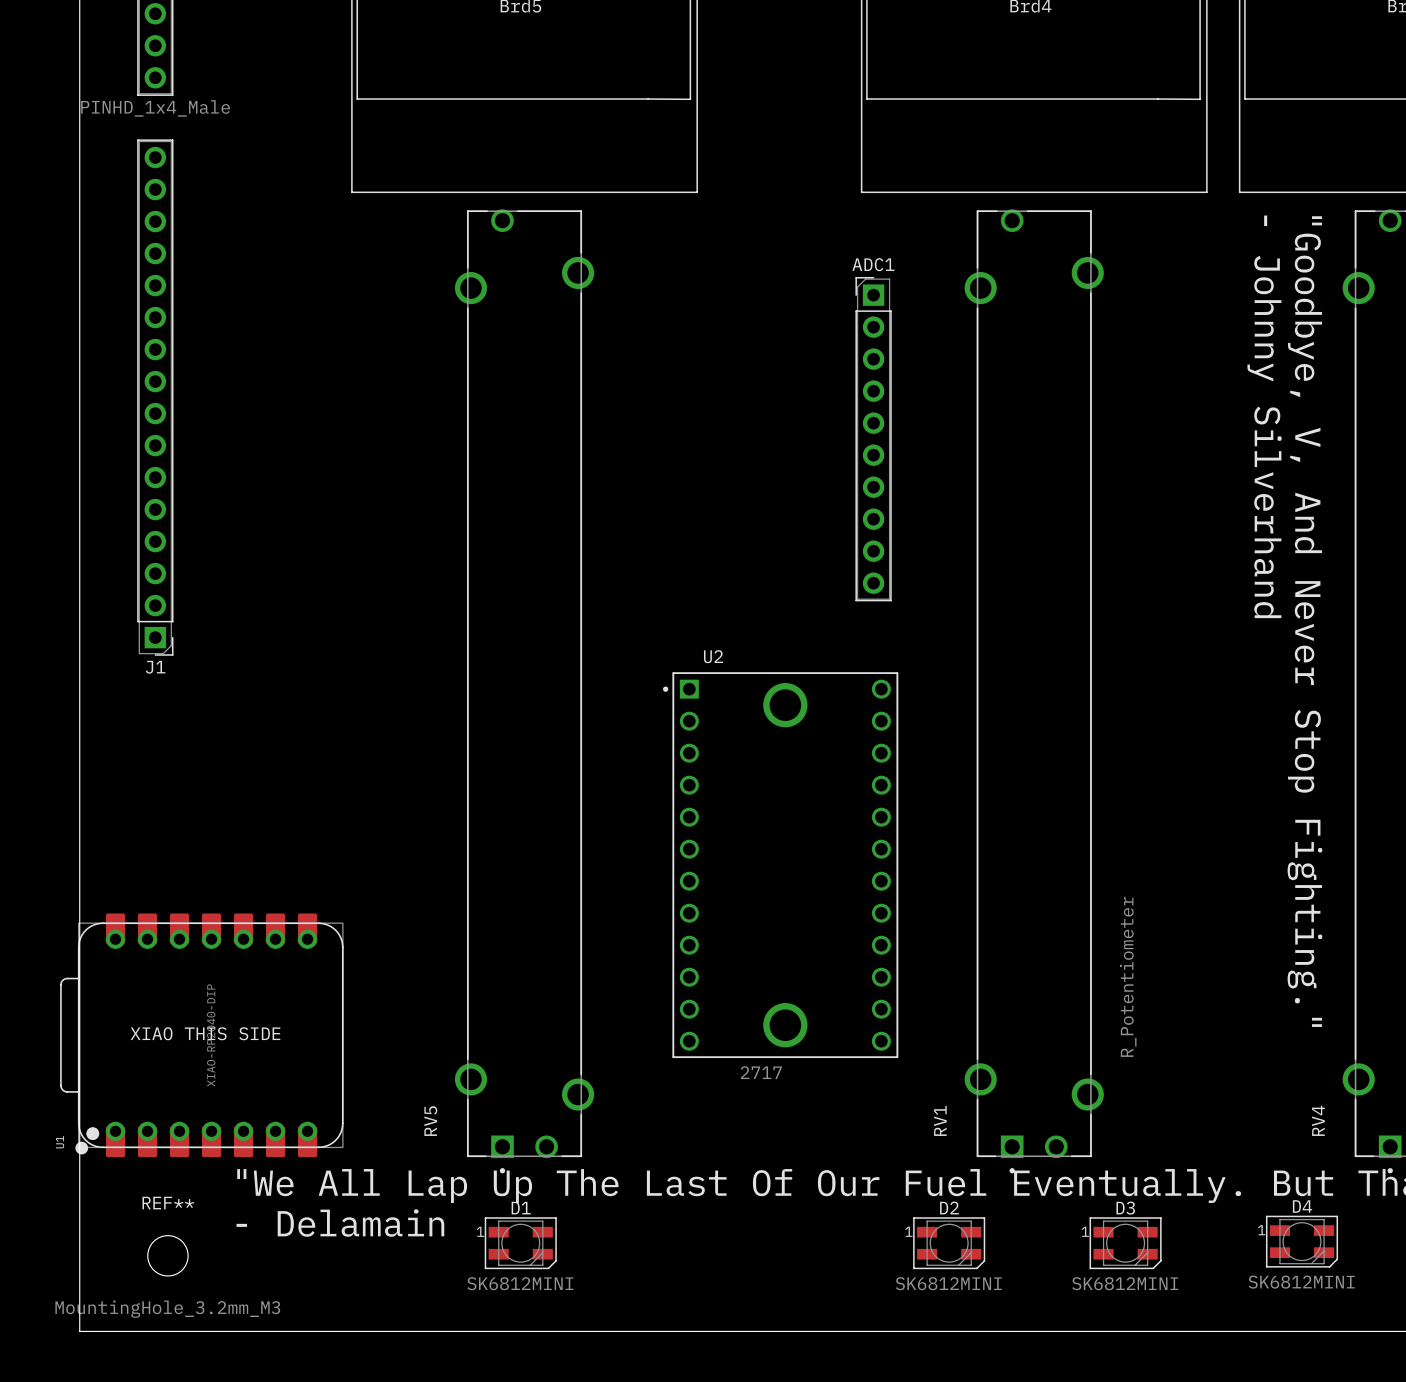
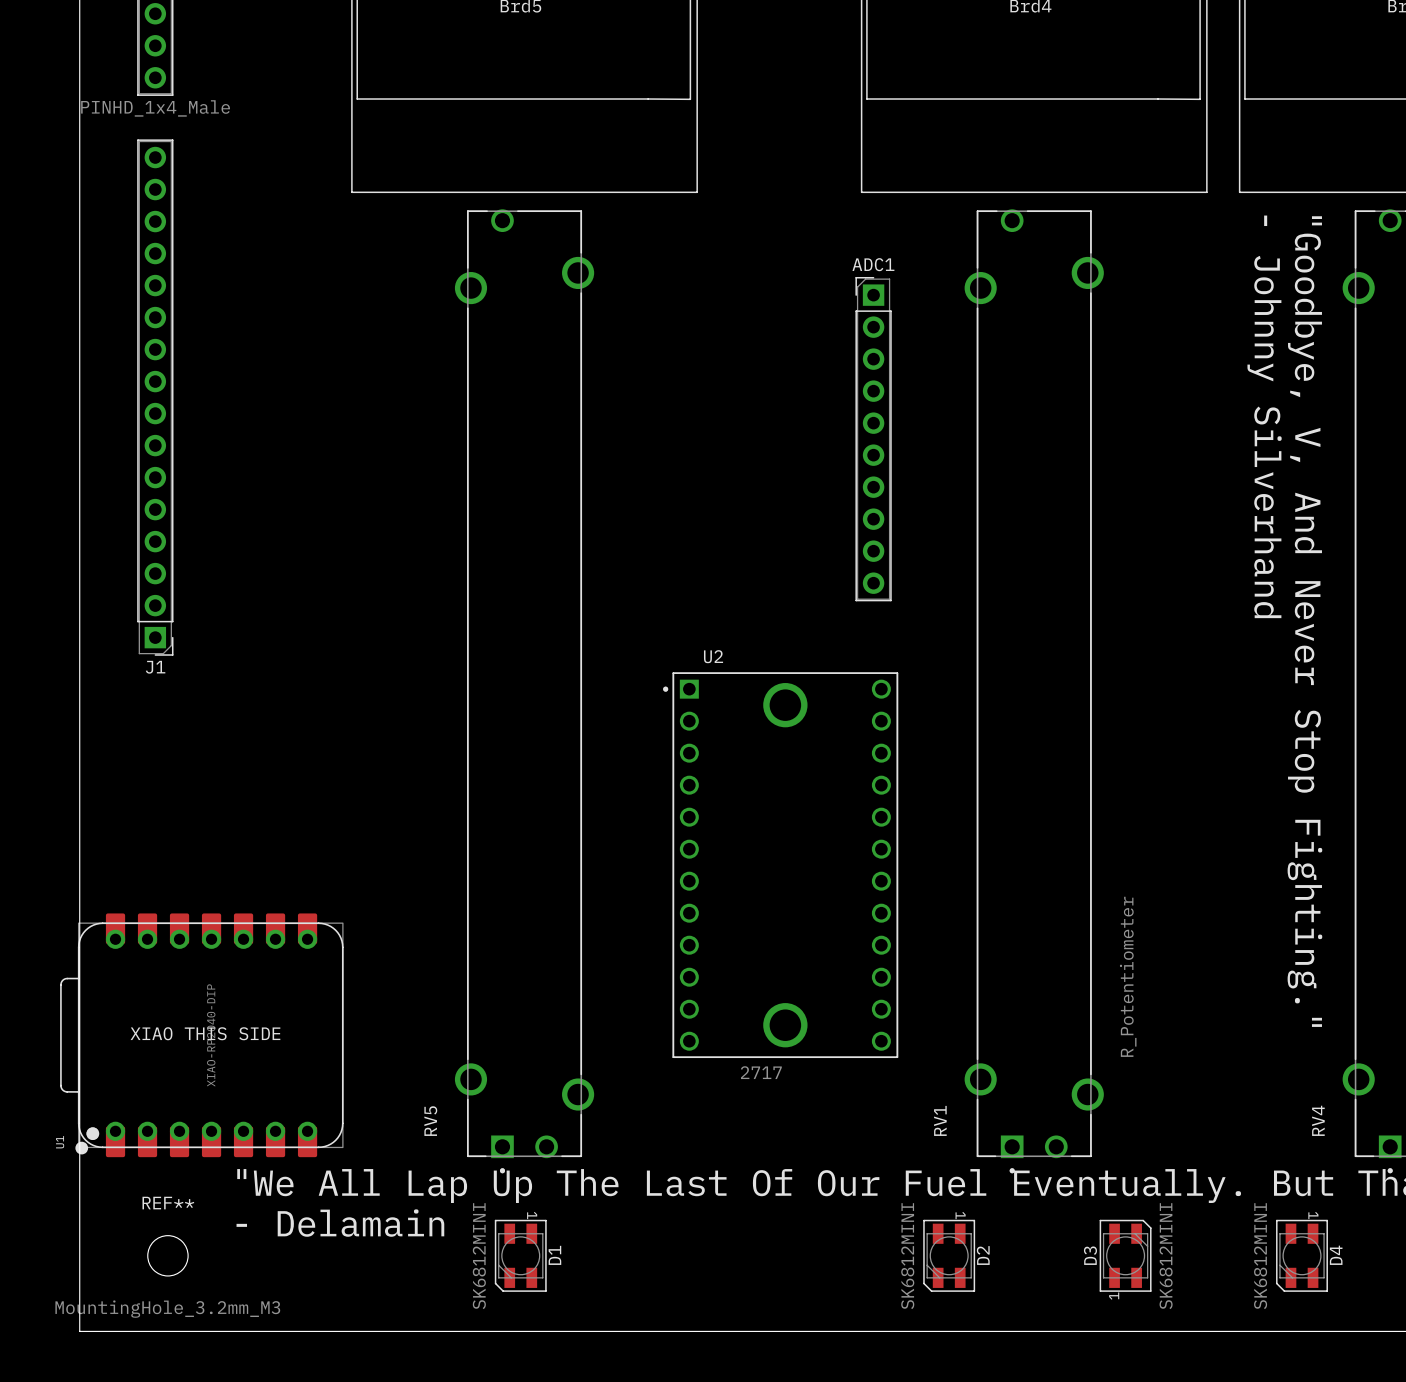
D4 rotation: 0° (1302, 1241) -> 90° clockwise (1302, 1255)
D1 rotation: 0° (520, 1243) -> 90° clockwise (520, 1255)
D2 rotation: 0° (949, 1243) -> 90° clockwise (949, 1255)
D3 rotation: 0° (1125, 1243) -> 90° counterclockwise (1125, 1255)

